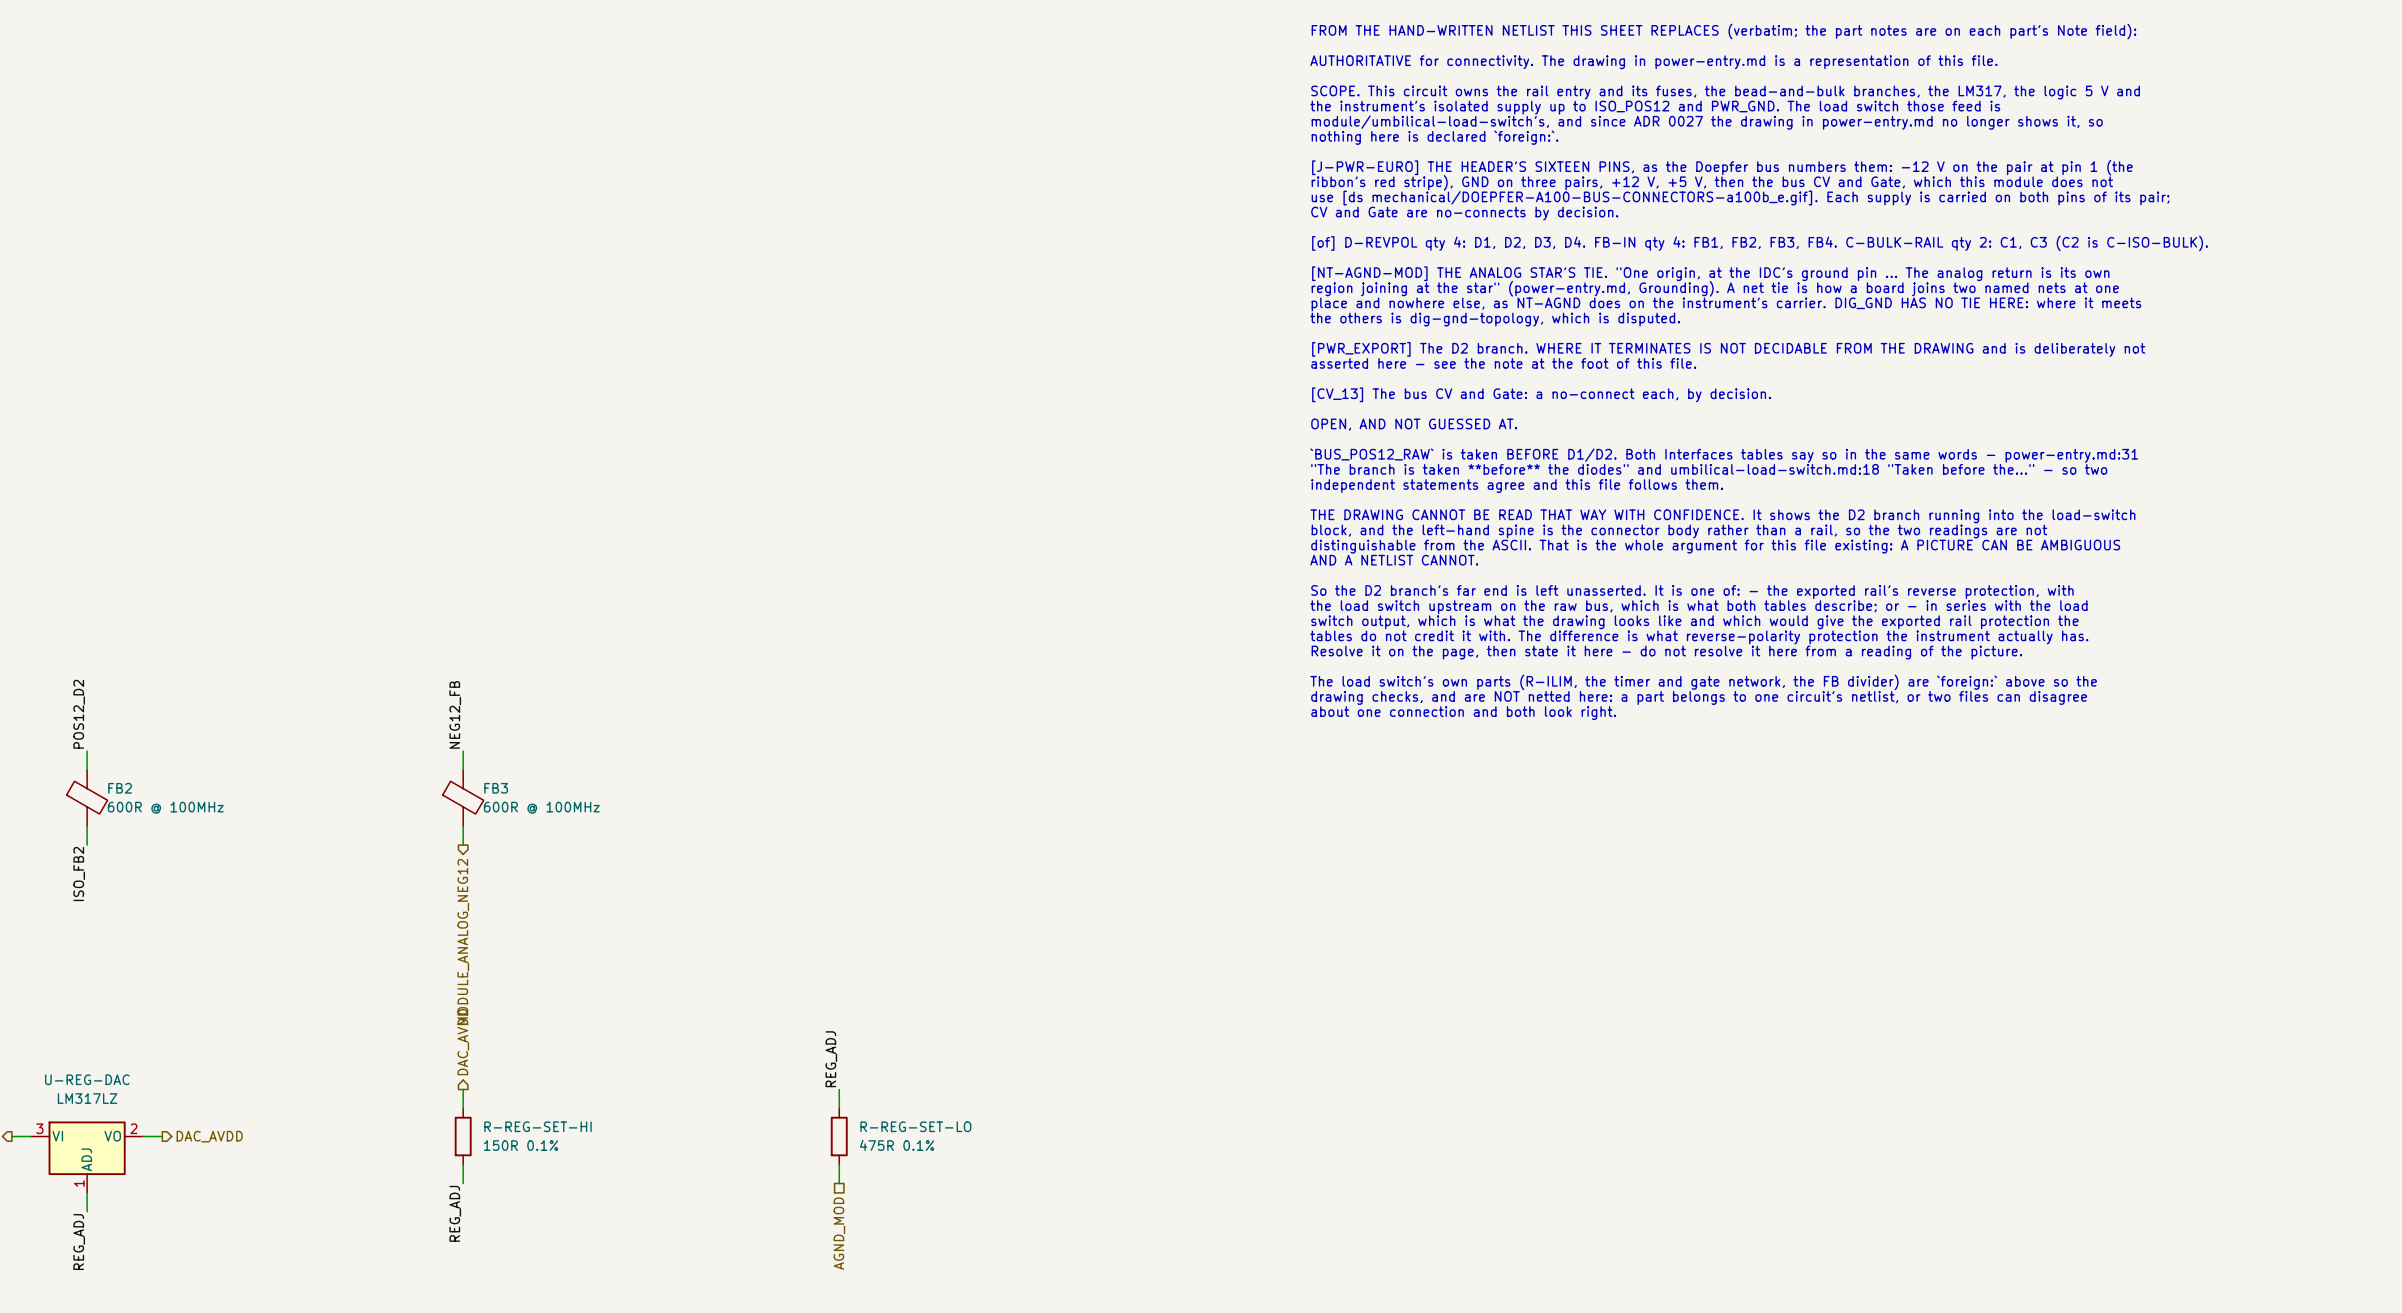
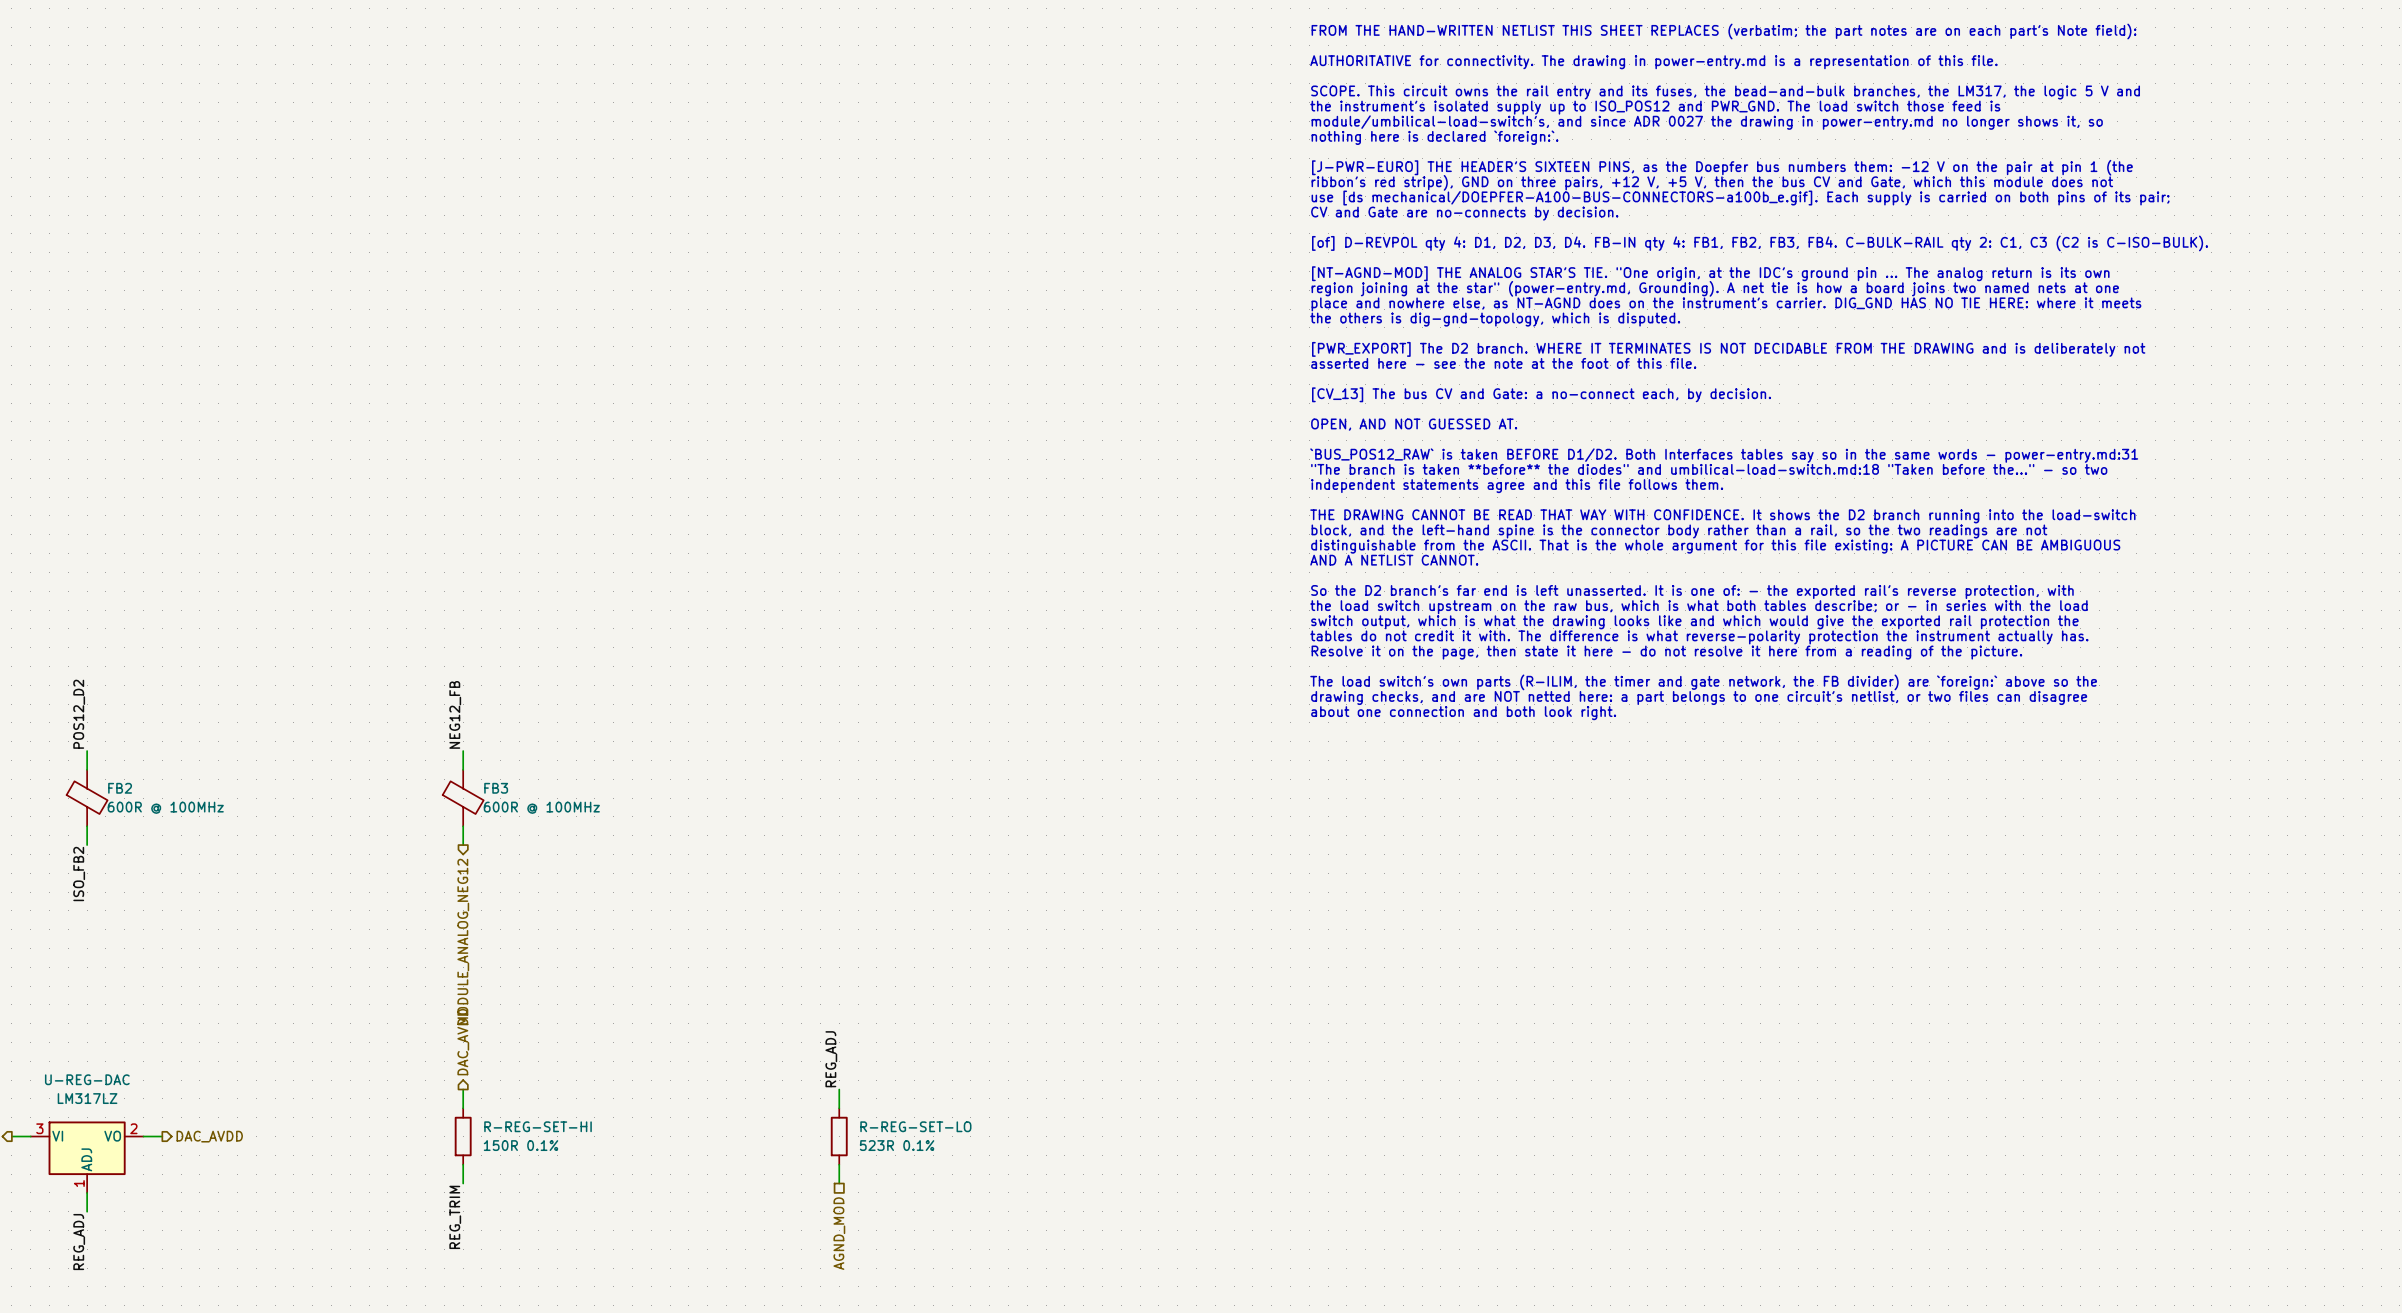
R-REG-SET-LO value: 475R 0.1% (897, 1145) -> 523R 0.1% (897, 1145)
label: REG_ADJ (455, 1213) -> REG_TRIM (455, 1217)

